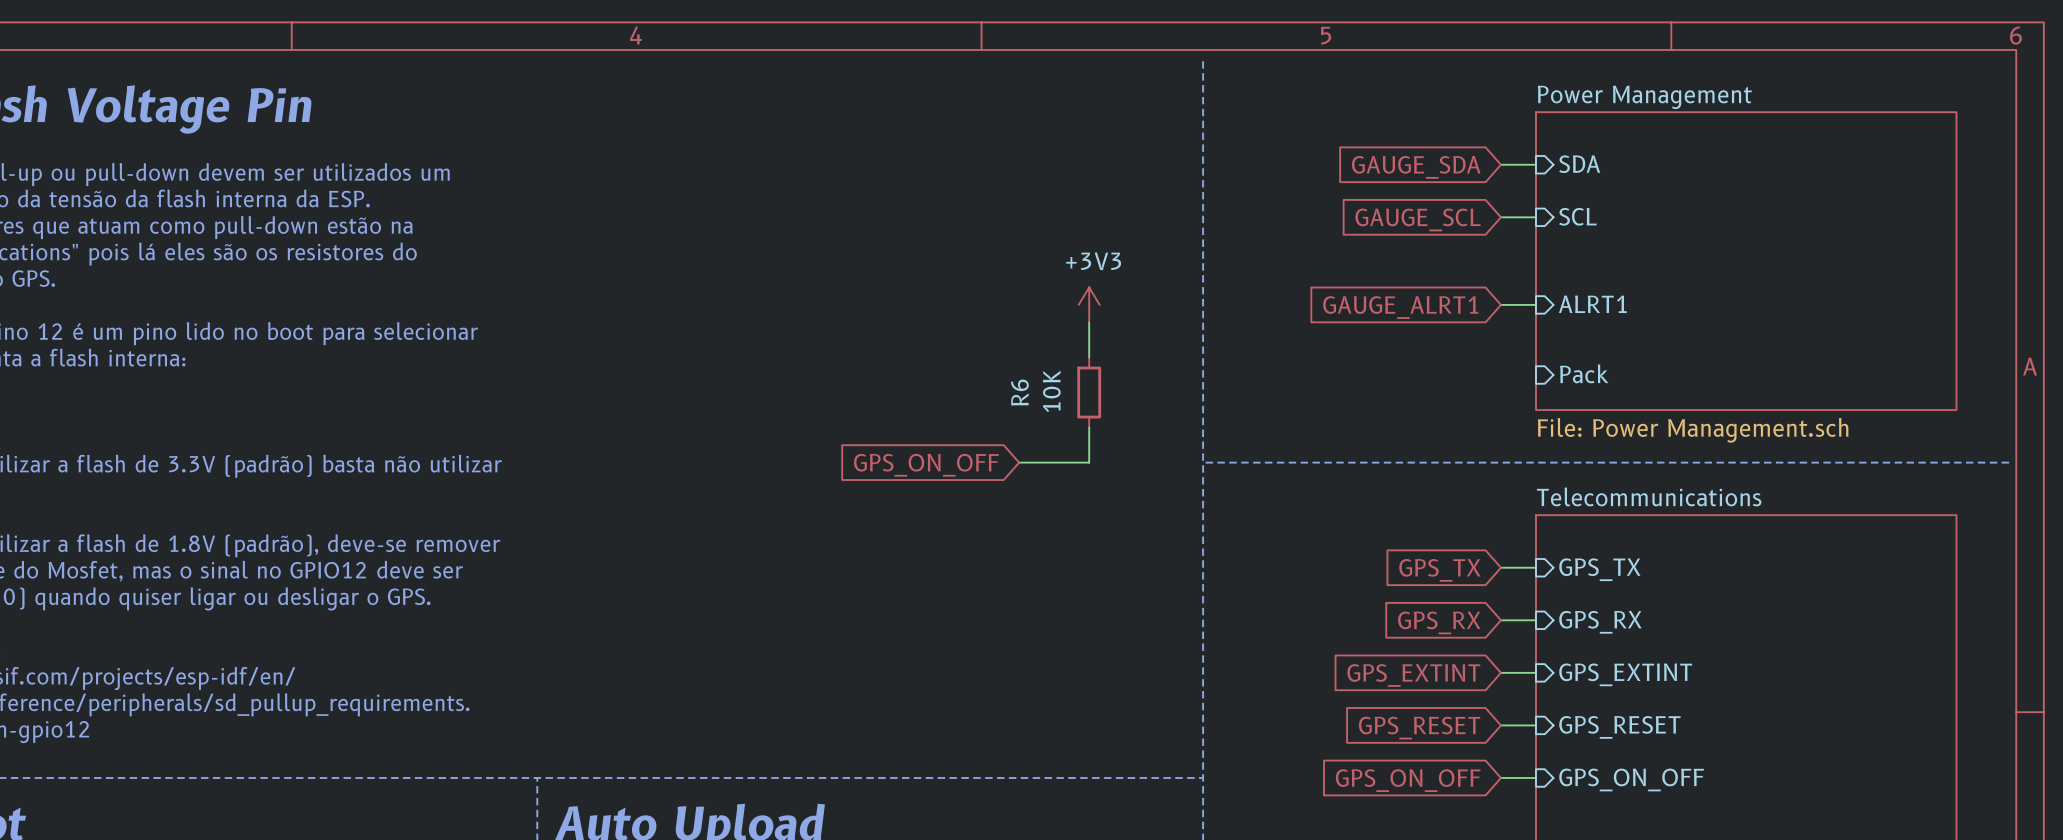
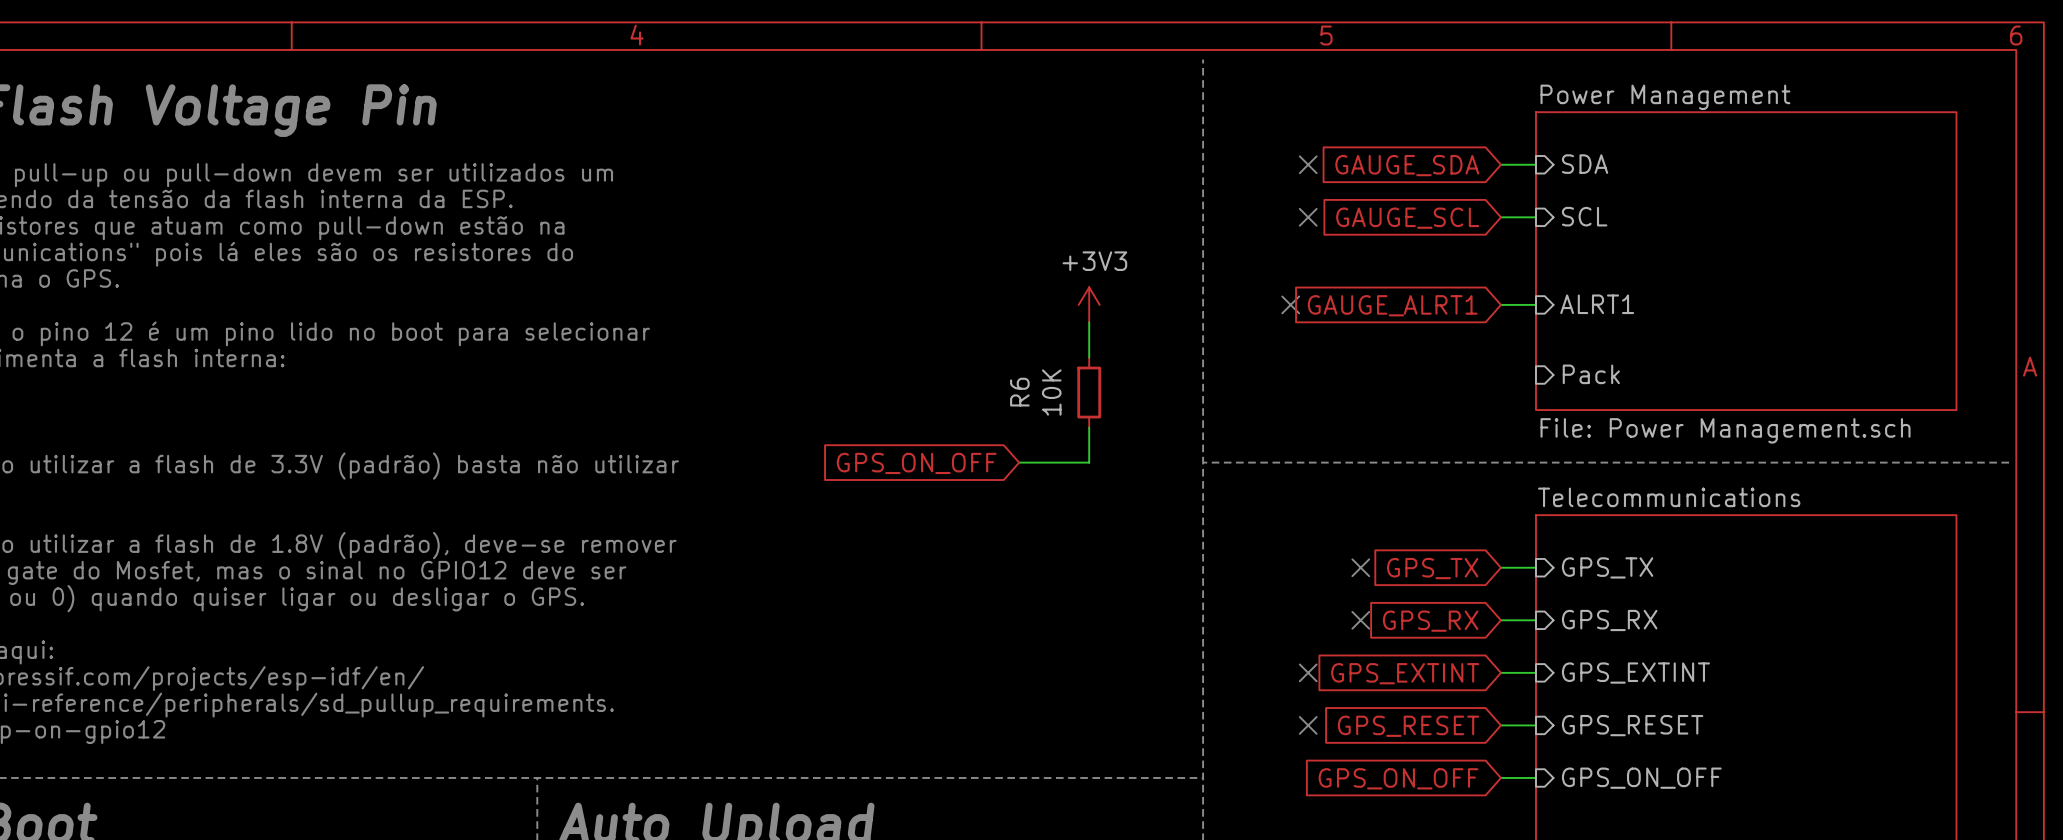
no-connect mark: none -> (1308, 164)
no-connect mark: none -> (1308, 217)
no-connect mark: none -> (1290, 304)
no-connect mark: none -> (1360, 567)
no-connect mark: none -> (1360, 620)
no-connect mark: none -> (1308, 672)
no-connect mark: none -> (1308, 725)

